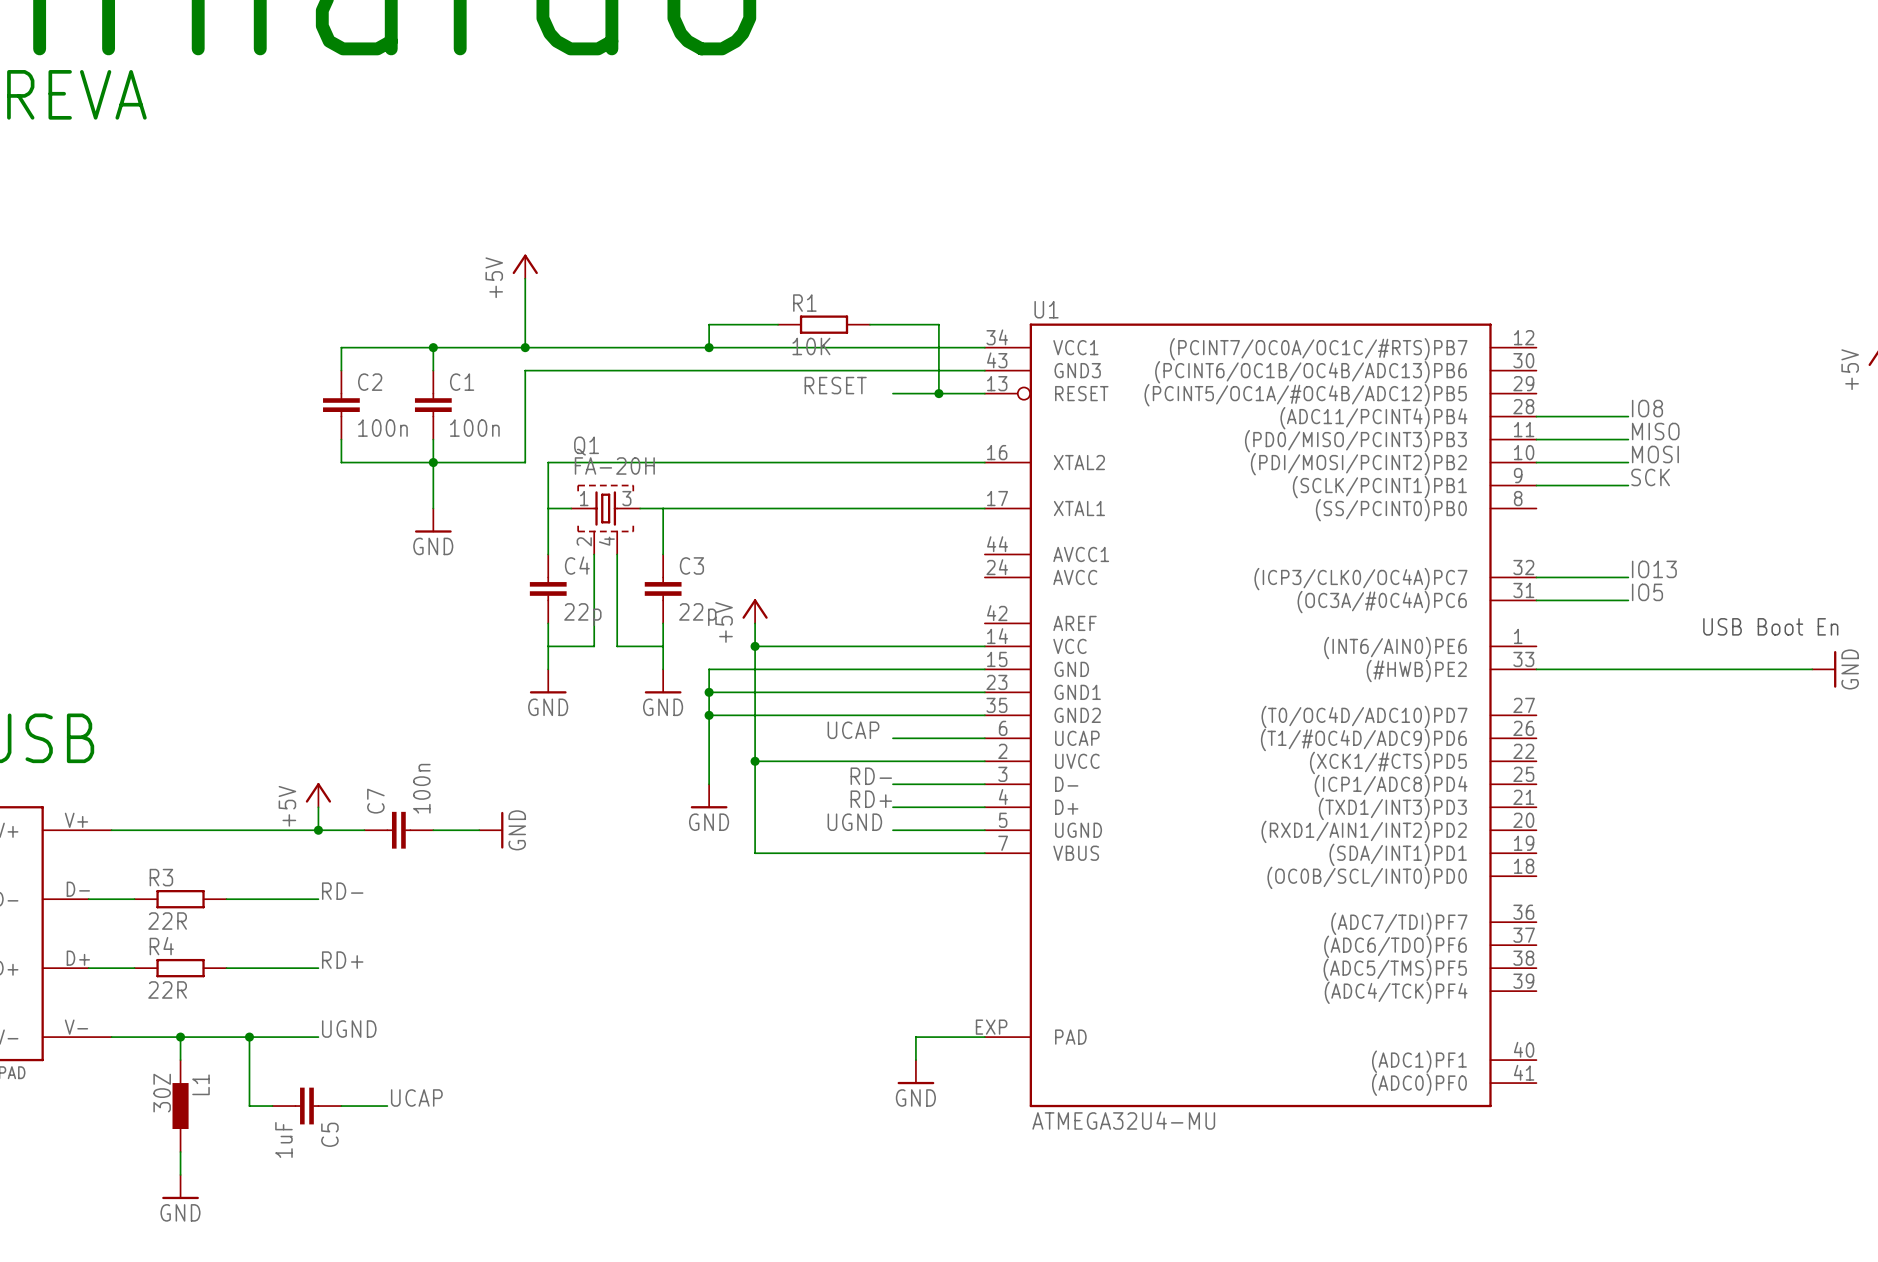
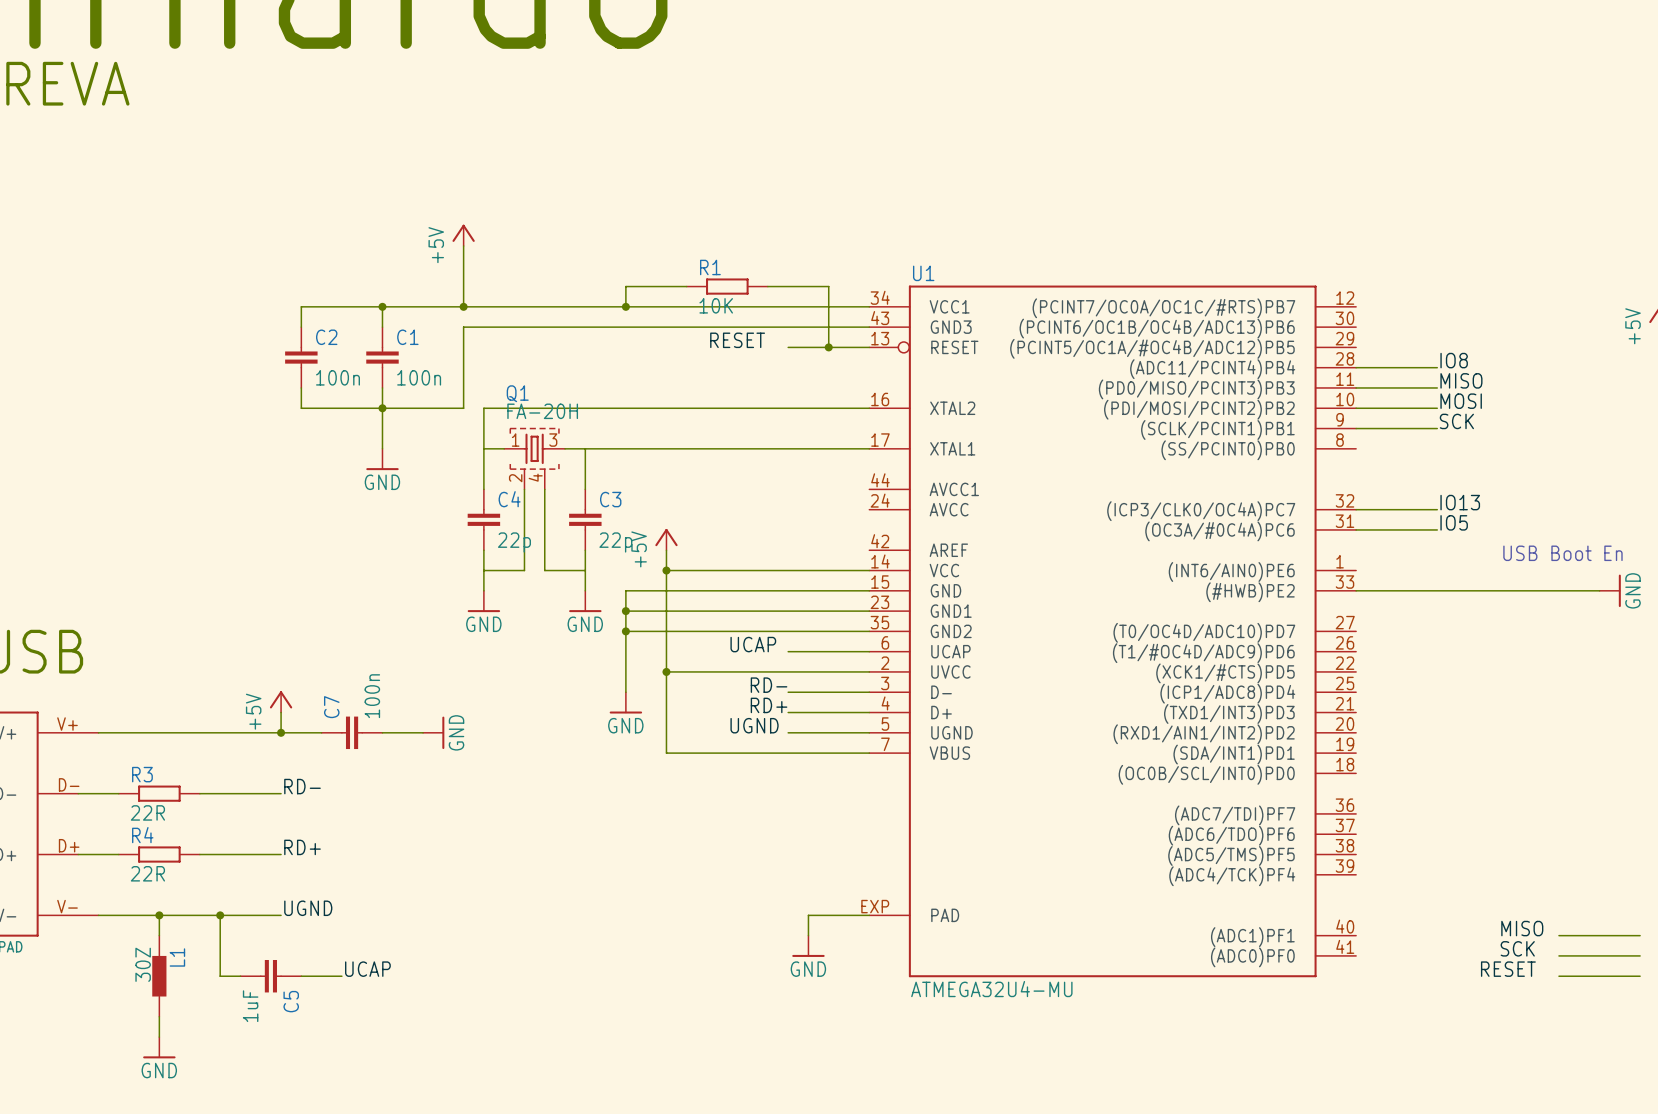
label: none -> MISO (1522, 928)
wire: none -> (1558, 935) (1640, 935)
label: none -> SCK (1517, 948)
wire: none -> (1558, 955) (1640, 955)
label: none -> RESET (1508, 969)
wire: none -> (1558, 976) (1640, 976)

